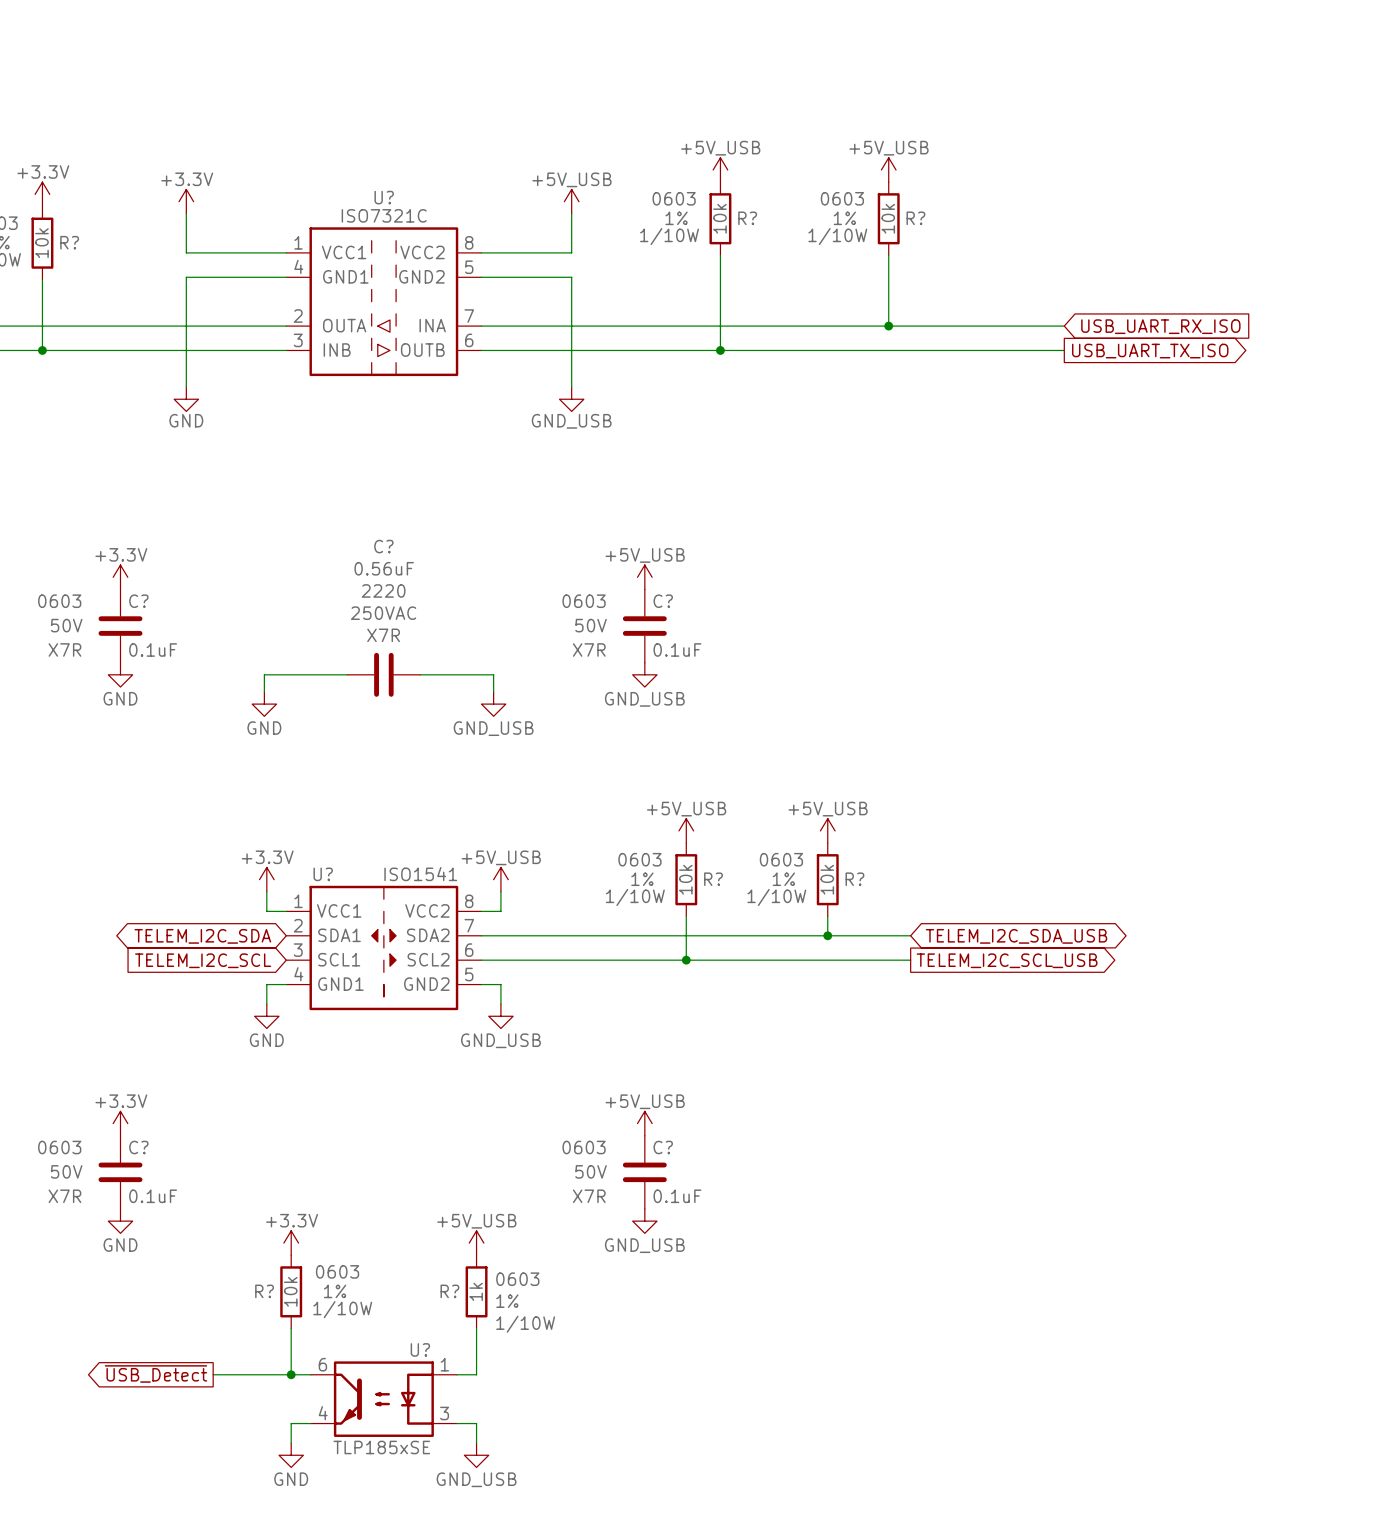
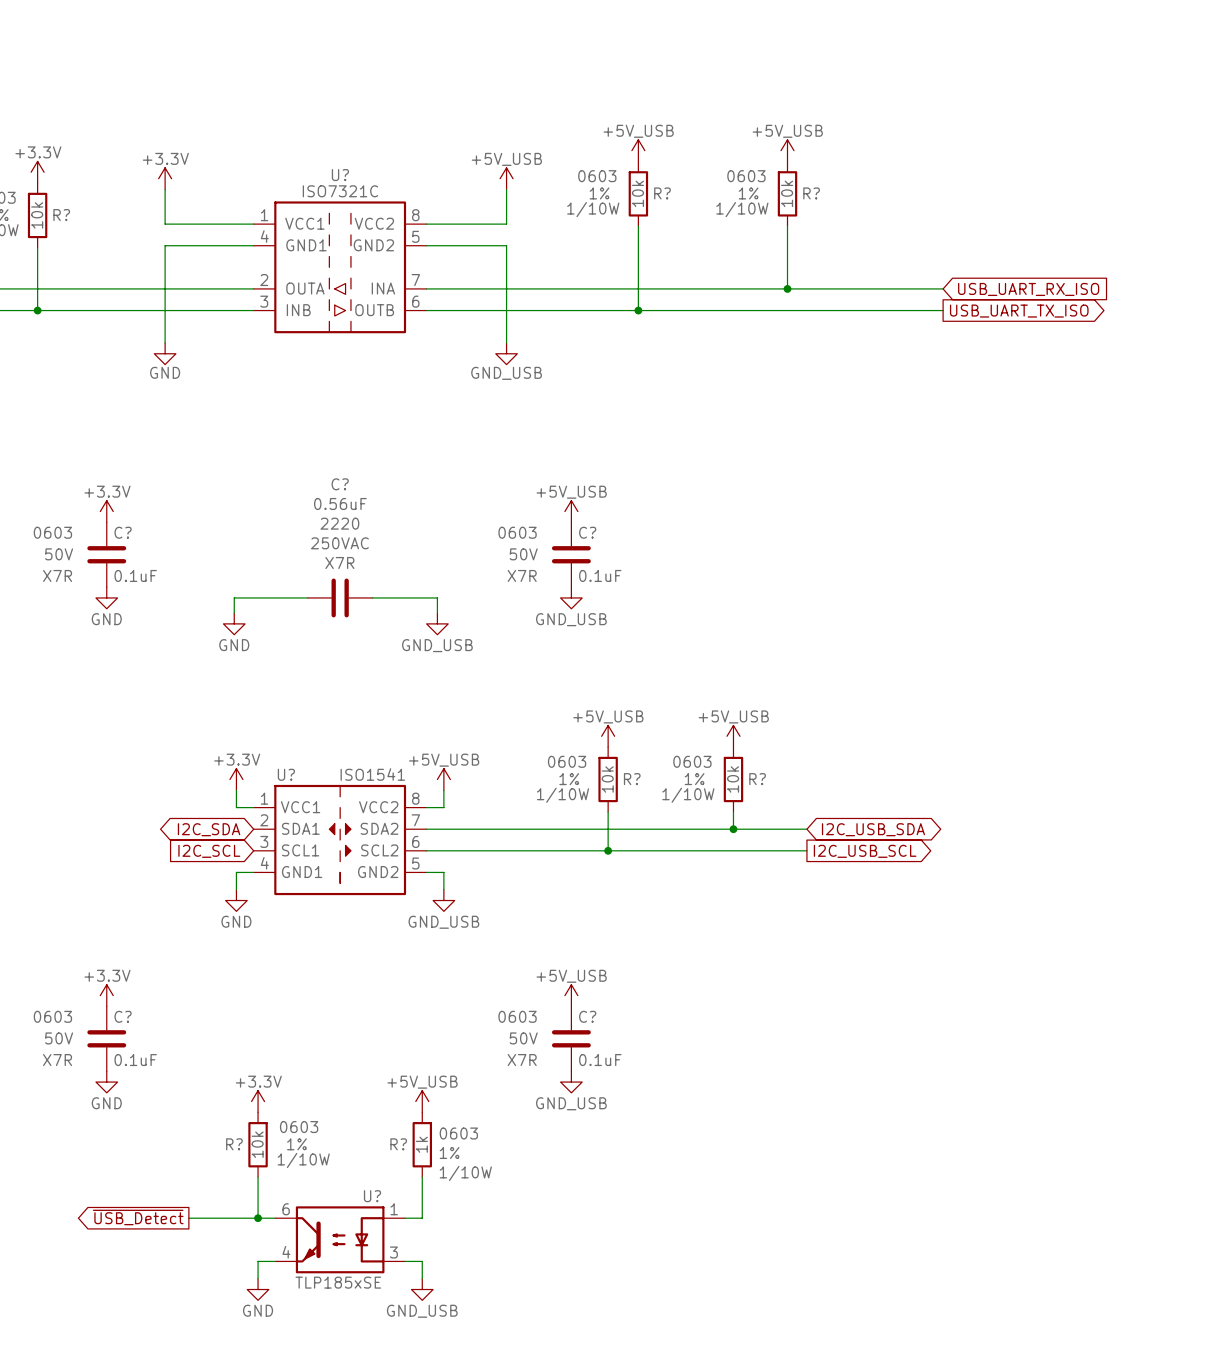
global label: TELEM_I2C_SDA (202, 936) -> I2C_SDA (209, 829)
global label: TELEM_I2C_SDA_USB (1016, 936) -> I2C_USB_SDA (873, 829)
global label: TELEM_I2C_SCL (203, 960) -> I2C_SCL (209, 851)
global label: TELEM_I2C_SCL_USB (1007, 960) -> I2C_USB_SCL (865, 851)

